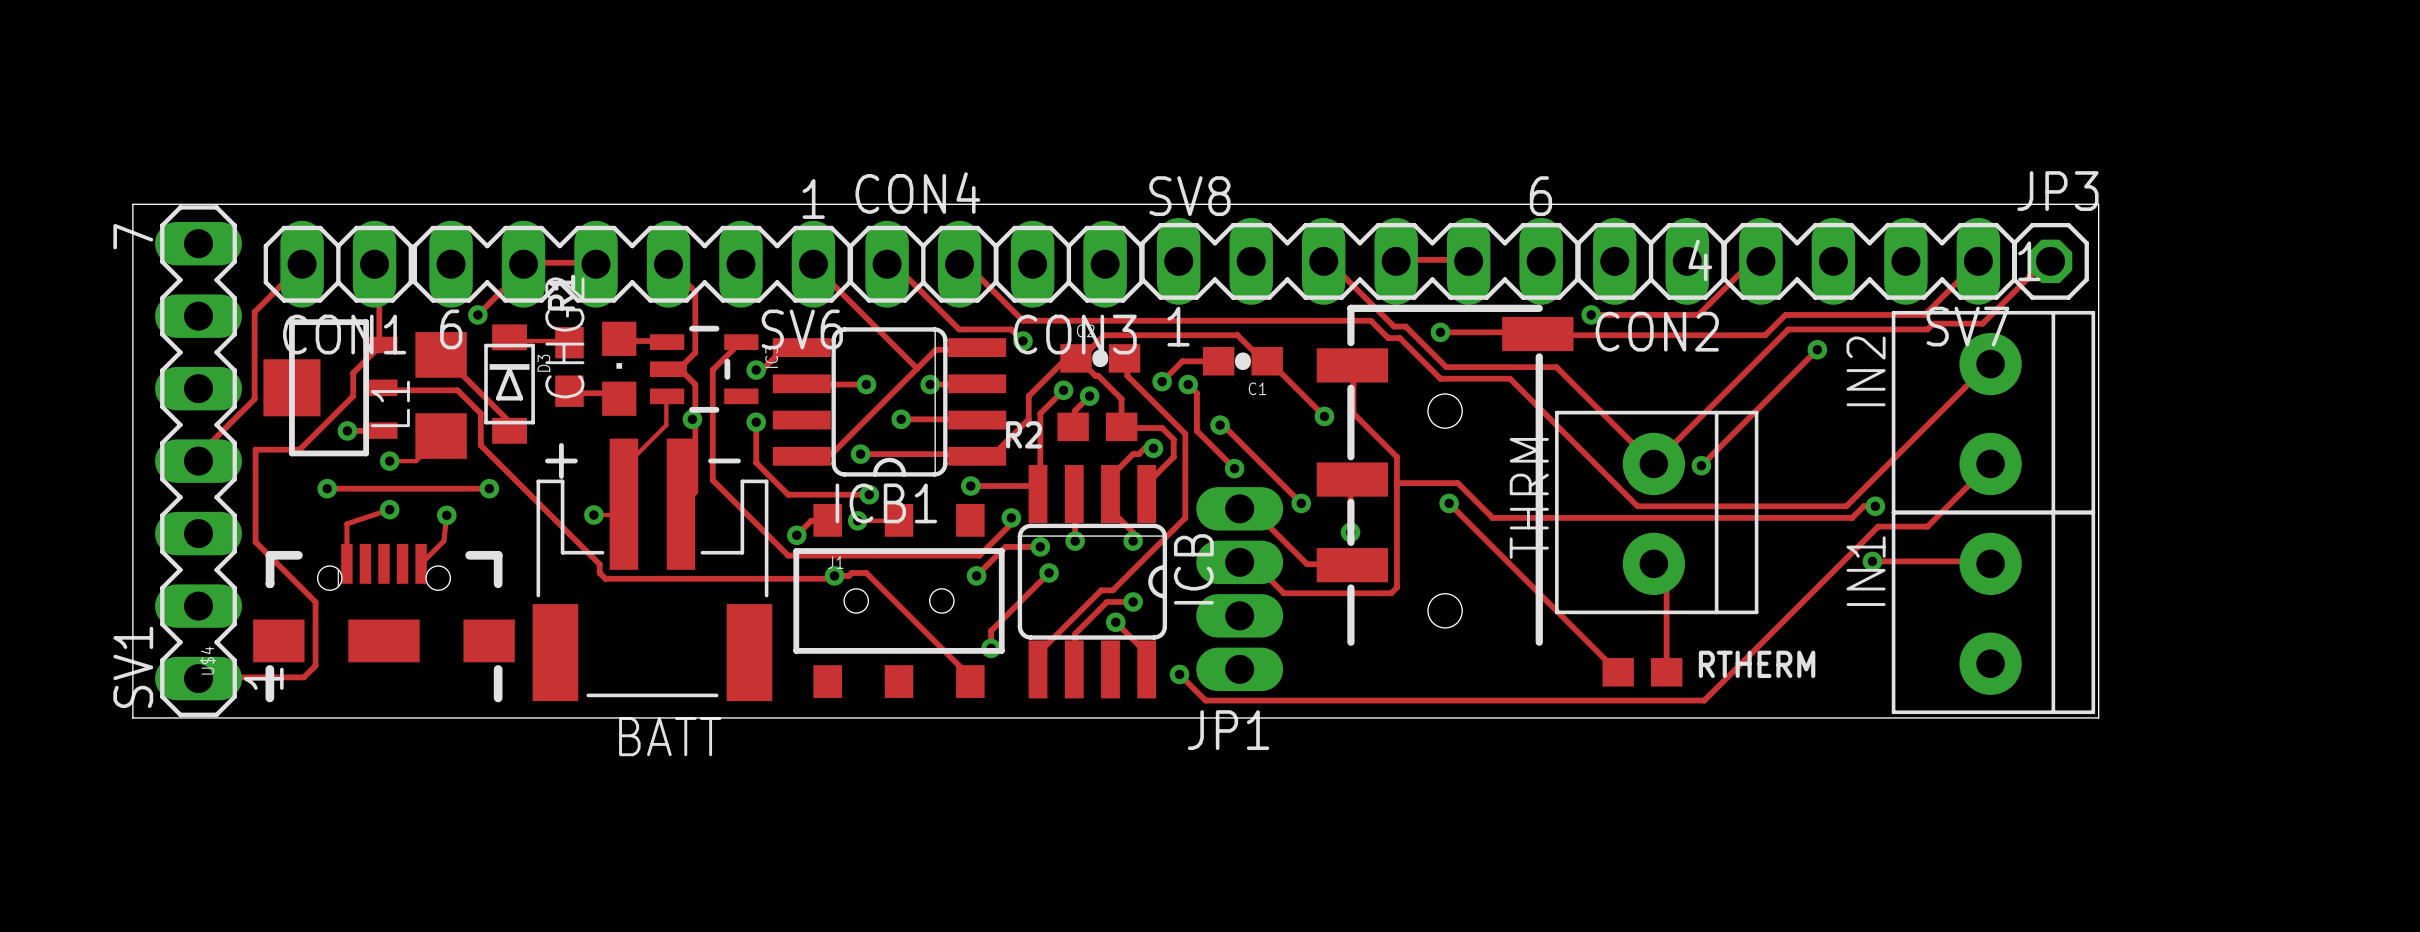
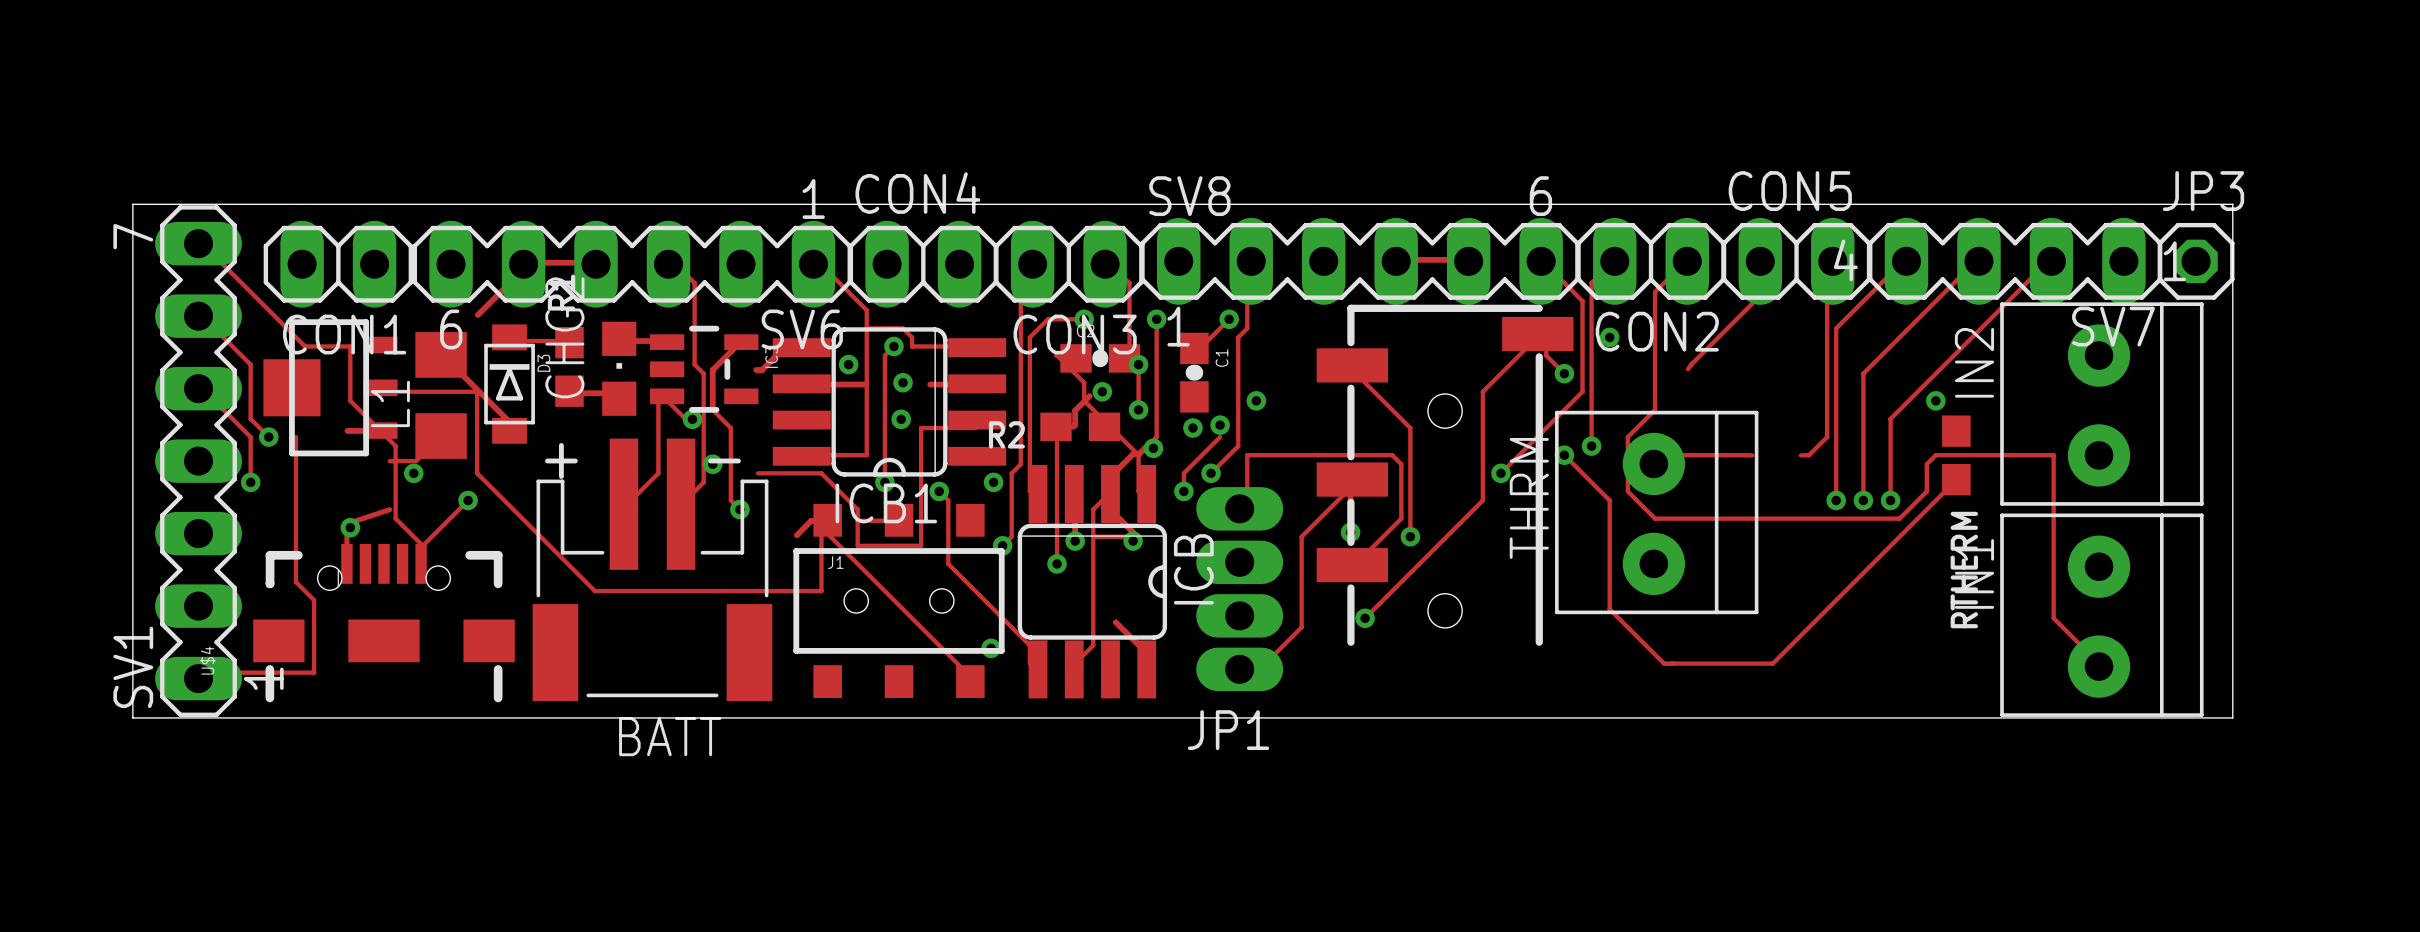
board edge: (2098, 204) (2098, 717) -> (2098, 204) (2232, 204) (2232, 717) (2098, 717)
track: none -> (198, 243) (205, 246) (305, 346) (350, 346) (350, 400) (395, 446) (395, 518) (422, 545)
track: none -> (1251, 261) (1247, 264) (1247, 328) (1238, 337) (1238, 446) (1211, 473)
track: (1323, 261) (1330, 262) (1394, 326) (1405, 326) (1446, 367) (1556, 367) (1653, 463) (1788, 329) (1927, 329) (1933, 323) (1982, 323) (2043, 262) (2050, 261) -> (1890, 500) (1890, 418) (2044, 264) (2051, 261)
track: none -> (1541, 261) (1582, 301) (1582, 391) (1500, 473)
track: none -> (1614, 261) (1591, 283) (1591, 446)
track: none -> (1687, 261) (1655, 292) (1655, 409) (1627, 437) (1627, 491) (1655, 518) (1899, 518) (1926, 491) (1926, 464) (1935, 455) (2053, 455) (2053, 618) (2098, 663) (2099, 666)
track: (1760, 261) (1750, 262) (1698, 314) (1591, 314) -> (1760, 261) (1754, 264) (1754, 301) (1688, 369)
CON5: none -> (1796, 261)
track: none -> (1832, 261) (1827, 264) (1827, 437) (1809, 455) (1800, 455)
SV7 position: (1869, 261) -> (2015, 261)
track: none -> (1906, 261) (1899, 264) (1836, 328) (1836, 500)
track: (1978, 261) (1924, 314) (1785, 314) (1765, 335) (1539, 335) (1536, 332) (1440, 332) -> (1978, 261) (1972, 264) (1863, 373) (1863, 500)
JP3 position: (2050, 261) -> (2196, 261)
track: (302, 264) (254, 312) (254, 399) (199, 454) (198, 461) -> none
track: (374, 264) (379, 268) (380, 344) (353, 372) (353, 396) (299, 449) (255, 449) (255, 542) (315, 601) (315, 665) (303, 677) (198, 678) -> (295, 437) (295, 582) (314, 600) (314, 672) (205, 672) (198, 678)
track: (668, 264) (695, 291) (695, 352) (680, 367) (669, 367) (667, 369) (683, 367) (683, 372) (695, 384) (695, 491) (681, 504) -> (668, 264) (676, 264) (694, 283) (694, 364) (703, 373) (703, 482) (681, 504)
track: (813, 264) (917, 368) -> (813, 264) (821, 264) (866, 310) (866, 455) (801, 456)
track: (887, 264) (895, 265) (959, 329) (1011, 329) (1022, 341) -> none
track: (959, 264) (967, 265) (1022, 320) (1370, 320) (1388, 338) (1399, 338) (1440, 378) (1510, 378) (1637, 506) (1846, 506) (1990, 364) -> none
track: none -> (1032, 264) (1020, 274) (1020, 464) (1011, 473) (1011, 536) (1002, 545)
track: none -> (1105, 264) (1111, 264) (1129, 283) (1129, 355) (1138, 364) (1138, 409)
via: (477, 314) -> none
via position: (1591, 314) -> (1609, 337)
track: none -> (198, 316) (205, 319) (250, 364) (250, 418) (268, 437)
track: none -> (1084, 319) (1047, 319) (1029, 337) (1029, 491) (1038, 494)
via: none -> (1084, 319)
track: none -> (1156, 319) (1156, 437) (1138, 455)
via: none -> (1156, 319)
track: none -> (1229, 319) (1201, 346) (1194, 348)
via: none -> (1229, 319)
via: (1440, 332) -> none
via: (1022, 341) -> none
track: none -> (893, 346) (884, 355) (884, 482)
via: none -> (893, 346)
track: (977, 347) (976, 349) (935, 349) (831, 454) (802, 454) (801, 456) -> (977, 347) (912, 346) (912, 337) (903, 328) (866, 328)
track: (1817, 349) (1701, 465) -> none
via: (1817, 349) -> none
track: none -> (1056, 355) (1084, 382) (1084, 400) (1102, 418) (1104, 426) (1111, 428) (1138, 455)
track: (1076, 358) (1095, 375) (1098, 375) (1121, 399) (1121, 426) (1162, 428) (1173, 439) (1173, 457) (1147, 483) (1146, 494) -> (1138, 455) (1138, 491) (1146, 494)
track: (1076, 358) (1080, 358) (1104, 335) (1237, 335) (1260, 358) (1266, 358) (1324, 416) -> none
track: (1076, 358) (1066, 358) (1028, 396) (1028, 419) (993, 454) (979, 454) (977, 456) (976, 454) (860, 454) -> none
track: (1124, 358) (1127, 358) (1127, 375) (1185, 433) (1185, 517) (1112, 590) (1101, 590) (1040, 651) (1040, 668) (1038, 669) -> (939, 491) (948, 500) (948, 563) (1029, 645) (1029, 663) (1038, 669)
track: (1218, 361) (1182, 361) (1162, 381) -> none
C1 rotation: 0° (1242, 361) -> 90° clockwise (1194, 372)
C1 position: (1242, 361) -> (1194, 372)
via: none -> (848, 364)
via: none -> (1138, 364)
track: (1352, 365) (1353, 413) (1396, 457) (1396, 587) (1391, 593) (1283, 593) (1254, 564) (1240, 564) (1239, 562) -> none
track: none -> (1352, 368) (1410, 428) (1410, 536)
via: (756, 370) -> none
track: none -> (1564, 373) (1546, 355) (1546, 337) (1537, 336) (1482, 391) (1482, 500) (1365, 618)
via: none -> (1564, 373)
via: (1162, 381) -> none
via: none -> (903, 382)
via: (866, 384) -> none
via: (930, 384) -> none
track: (1188, 384) (1196, 393) (1196, 430) (1234, 468) -> none
via: (1188, 384) -> none
track: (380, 387) (382, 390) (457, 390) (480, 413) (480, 445) (599, 564) (599, 572) (605, 578) (831, 578) (834, 575) (849, 575) (851, 572) (866, 572) (967, 674) (967, 680) (970, 681) -> (380, 387) (386, 391) (477, 391) (477, 473) (594, 591) (821, 591) (821, 527) (827, 520) (830, 527) (830, 536) (966, 672) (970, 681)
track: none -> (198, 388) (205, 391) (250, 437) (250, 482)
track: (1063, 390) (1040, 413) (1040, 491) (1038, 494) (1040, 486) (970, 486) -> none
via: (1063, 390) -> none
track: (667, 396) (666, 425) (625, 465) (625, 503) (614, 515) (593, 515) -> none
via position: (1089, 396) -> (1102, 391)
via: none -> (1256, 400)
via: none -> (1935, 400)
track: (712, 409) (712, 480) (788, 555) (979, 555) (1011, 523) (1011, 517) -> (712, 409) (730, 428) (730, 500) (739, 509)
via: none -> (1138, 409)
IN2 position: (1993, 412) -> (2101, 404)
via: (1324, 416) -> none
track: none -> (685, 418) (667, 400) (667, 396) (658, 400) (658, 473) (631, 500) (623, 504)
track: (901, 419) (977, 420) -> (758, 473) (821, 473) (857, 509) (857, 545) (921, 545) (921, 428) (975, 428) (977, 420)
track: (756, 422) (756, 462) (788, 494) (869, 494) -> none
via: (756, 422) -> none
track: (1220, 425) (1223, 425) (1301, 503) -> none
track: none -> (1056, 426) (1057, 563)
R2 position: (1097, 426) -> (1080, 426)
via: none -> (1192, 428)
via: (347, 430) -> none
via: none -> (268, 437)
track: none -> (1220, 437) (1183, 473) (1183, 491)
via: none -> (1591, 446)
via: (860, 454) -> none
track: none -> (1564, 455) (1609, 500) (1609, 609) (1664, 663) (1772, 663) (1956, 479)
via: none -> (1564, 455)
track: none -> (1752, 455) (1664, 455) (1659, 463)
via: (389, 461) -> none
track: (1990, 463) (1927, 526) (1878, 526) (1704, 700) (1205, 700) (1179, 674) -> none
via: none -> (712, 464)
via: (1701, 465) -> none
via position: (1234, 468) -> (1211, 473)
via: none -> (413, 473)
via: none -> (1500, 473)
via: none -> (250, 482)
via: none -> (993, 482)
track: none -> (1352, 482) (1346, 491) (1301, 536) (1301, 627) (1265, 663) (1247, 663) (1245, 672)
track: (1396, 483) (1457, 483) (1492, 517) (1852, 517) (1863, 506) (1875, 506) -> none
via: (970, 486) -> none
track: (327, 488) (489, 488) -> none
via: (327, 488) -> none
via: (489, 488) -> none
via: none -> (939, 491)
via: none -> (1183, 491)
via position: (869, 494) -> (884, 482)
track: none -> (468, 500) (422, 545)
via: none -> (468, 500)
via: none -> (1836, 500)
via: none -> (1863, 500)
via: none -> (1890, 500)
via: (1301, 503) -> none
track: (1449, 503) (1618, 672) -> none
via: (1449, 503) -> none
via: (1875, 506) -> none
track: (1239, 508) (1252, 509) (1307, 564) (1352, 565) -> none
via: (389, 509) -> none
via: none -> (739, 509)
track: none -> (1245, 511) (1247, 509) (1247, 455) (1392, 455) (1401, 464) (1401, 518) (1352, 568)
track: (446, 515) (443, 541) (421, 563) -> none
via: (446, 515) -> none
via: (593, 515) -> none
via: (1011, 517) -> none
via: (857, 520) -> none
via: none -> (350, 527)
via: (796, 535) -> none
track: none -> (1093, 536) (1129, 536)
via: none -> (1410, 536)
via: none -> (1002, 545)
track: (1040, 546) (1005, 546) (976, 575) -> none
via: (1040, 546) -> none
track: (1872, 561) (1988, 561) (1990, 563) -> none
via: (1872, 561) -> none
via: none -> (1057, 563)
track: (1653, 563) (1666, 575) (1666, 672) -> none
track: (1049, 572) (991, 630) (991, 648) -> none
via: (1049, 572) -> none
via: (834, 575) -> none
via: (976, 575) -> none
track: (1133, 601) (1107, 601) (1075, 633) (1074, 669) -> (1110, 494) (1093, 509) (1093, 645) (1075, 663) (1074, 669)
via: (1133, 601) -> none
IN1 position: (1993, 612) -> (2101, 615)
via: none -> (1365, 618)
via: (1115, 622) -> none
RTHERM rotation: 0° (1642, 672) -> 90° clockwise (1956, 455)
RTHERM position: (1642, 672) -> (1956, 455)
via: (1179, 674) -> none

